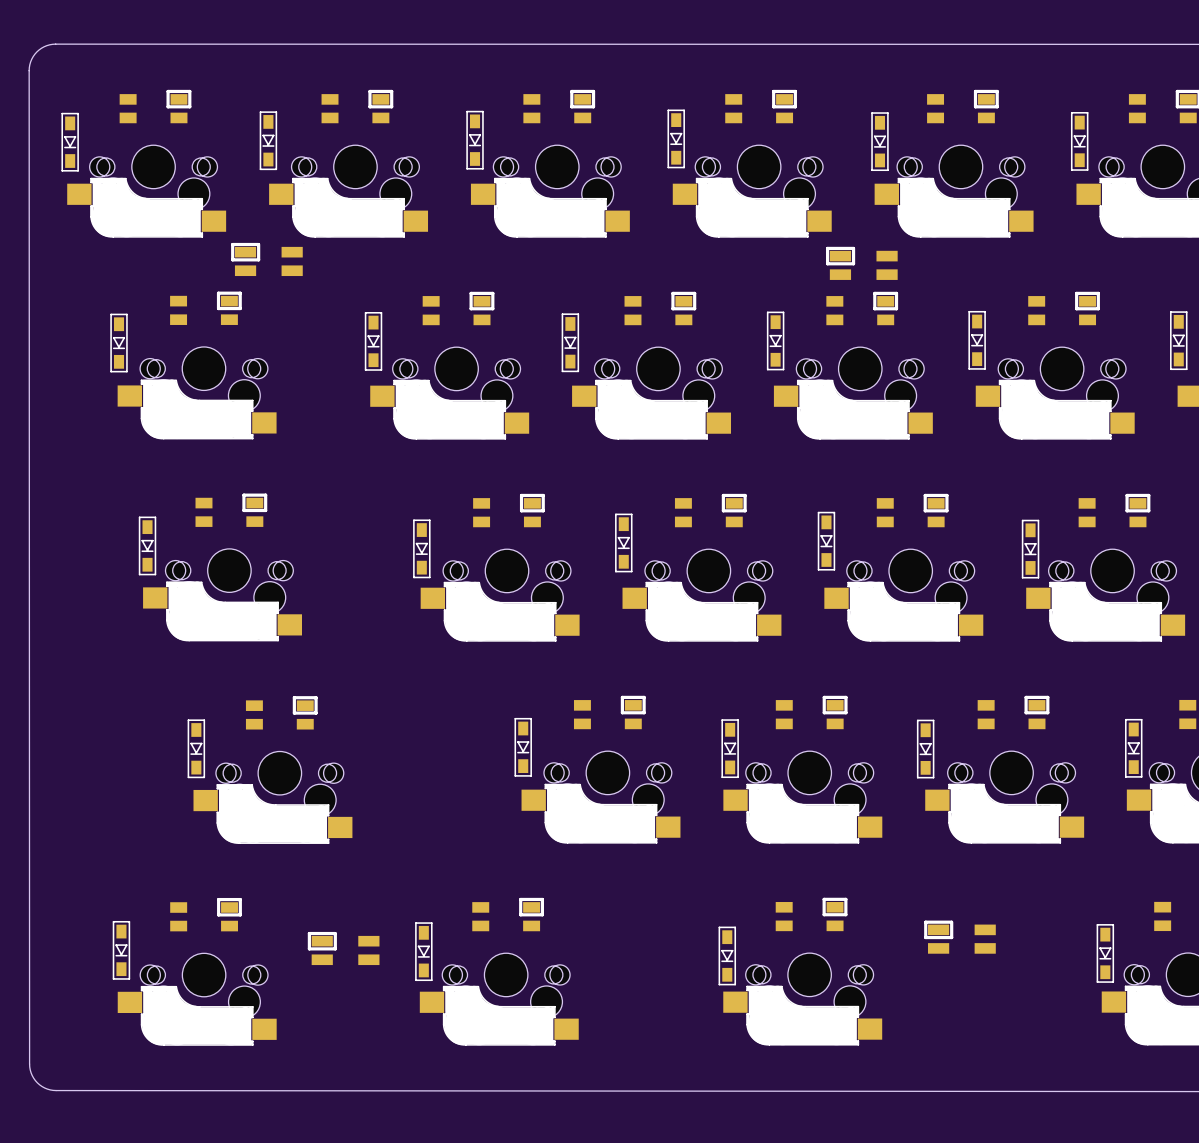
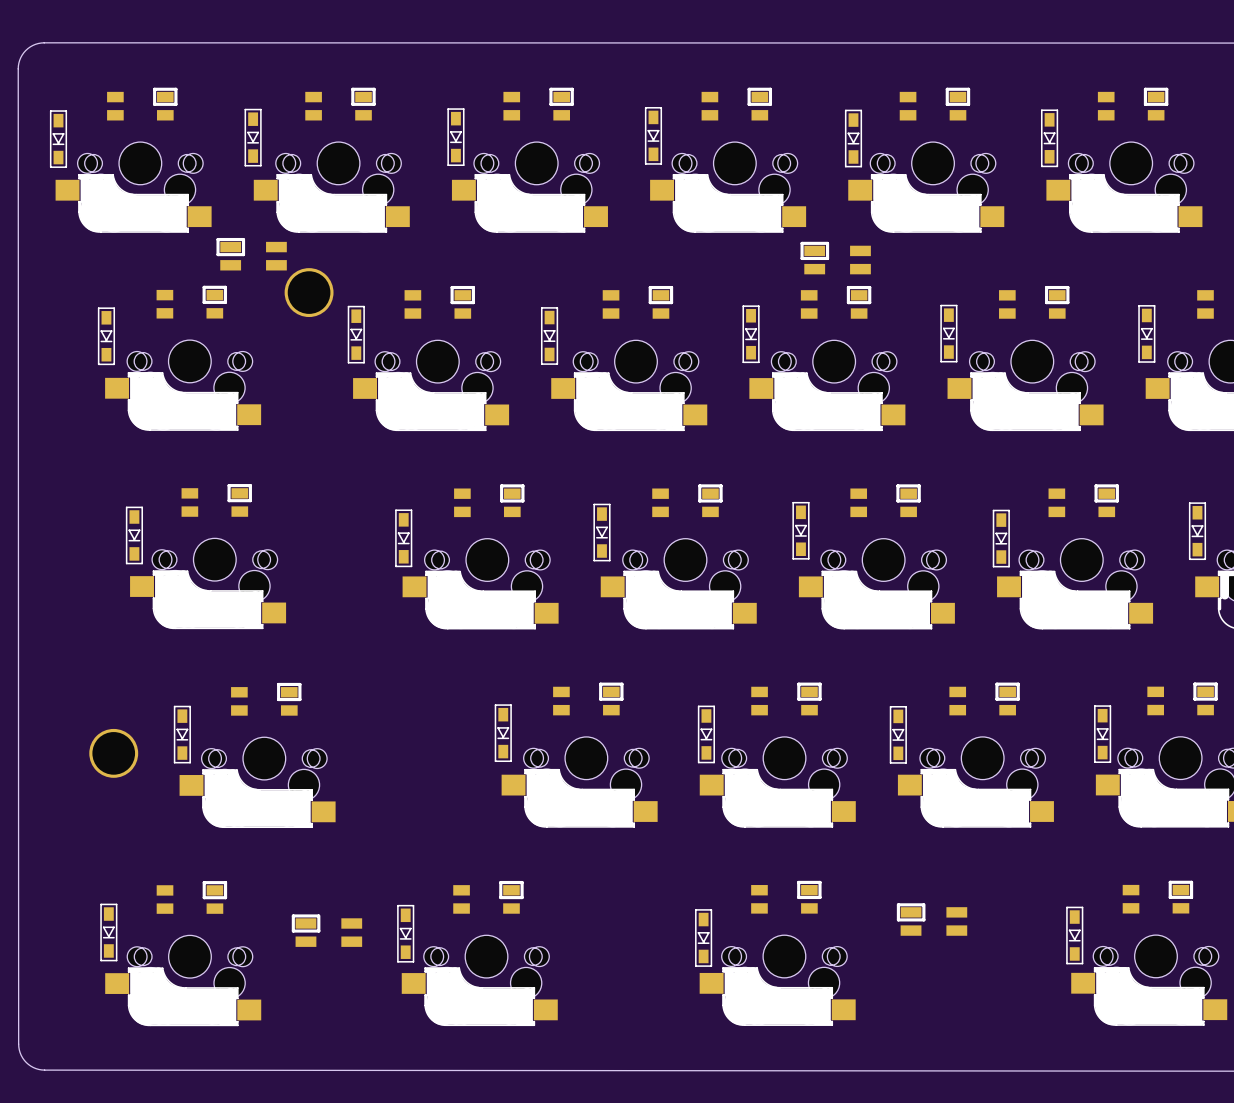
part: none -> (309, 292)
part: none -> (113, 753)

